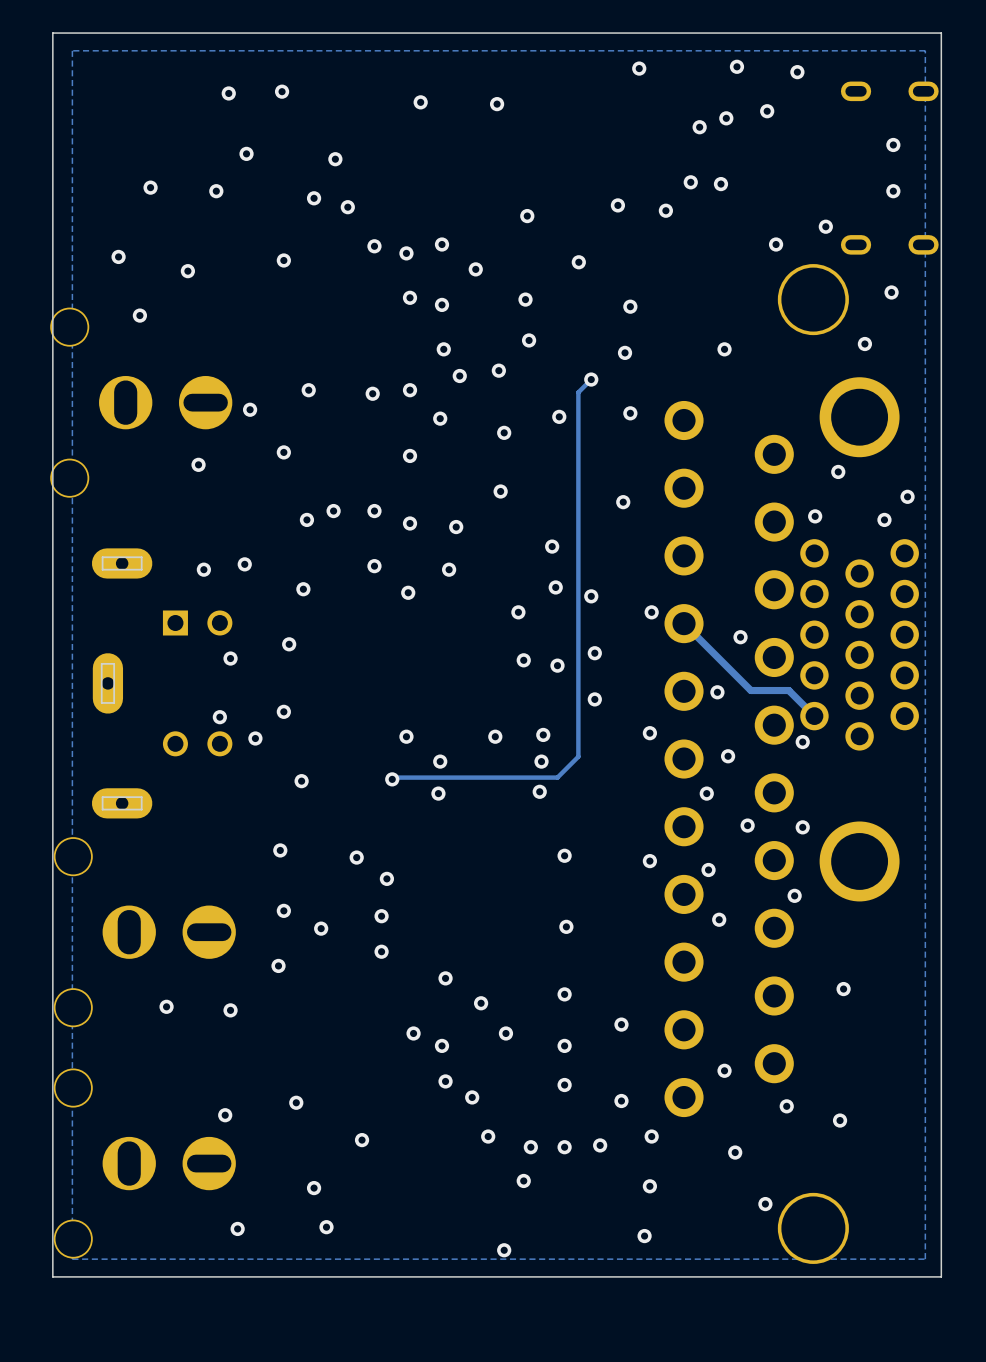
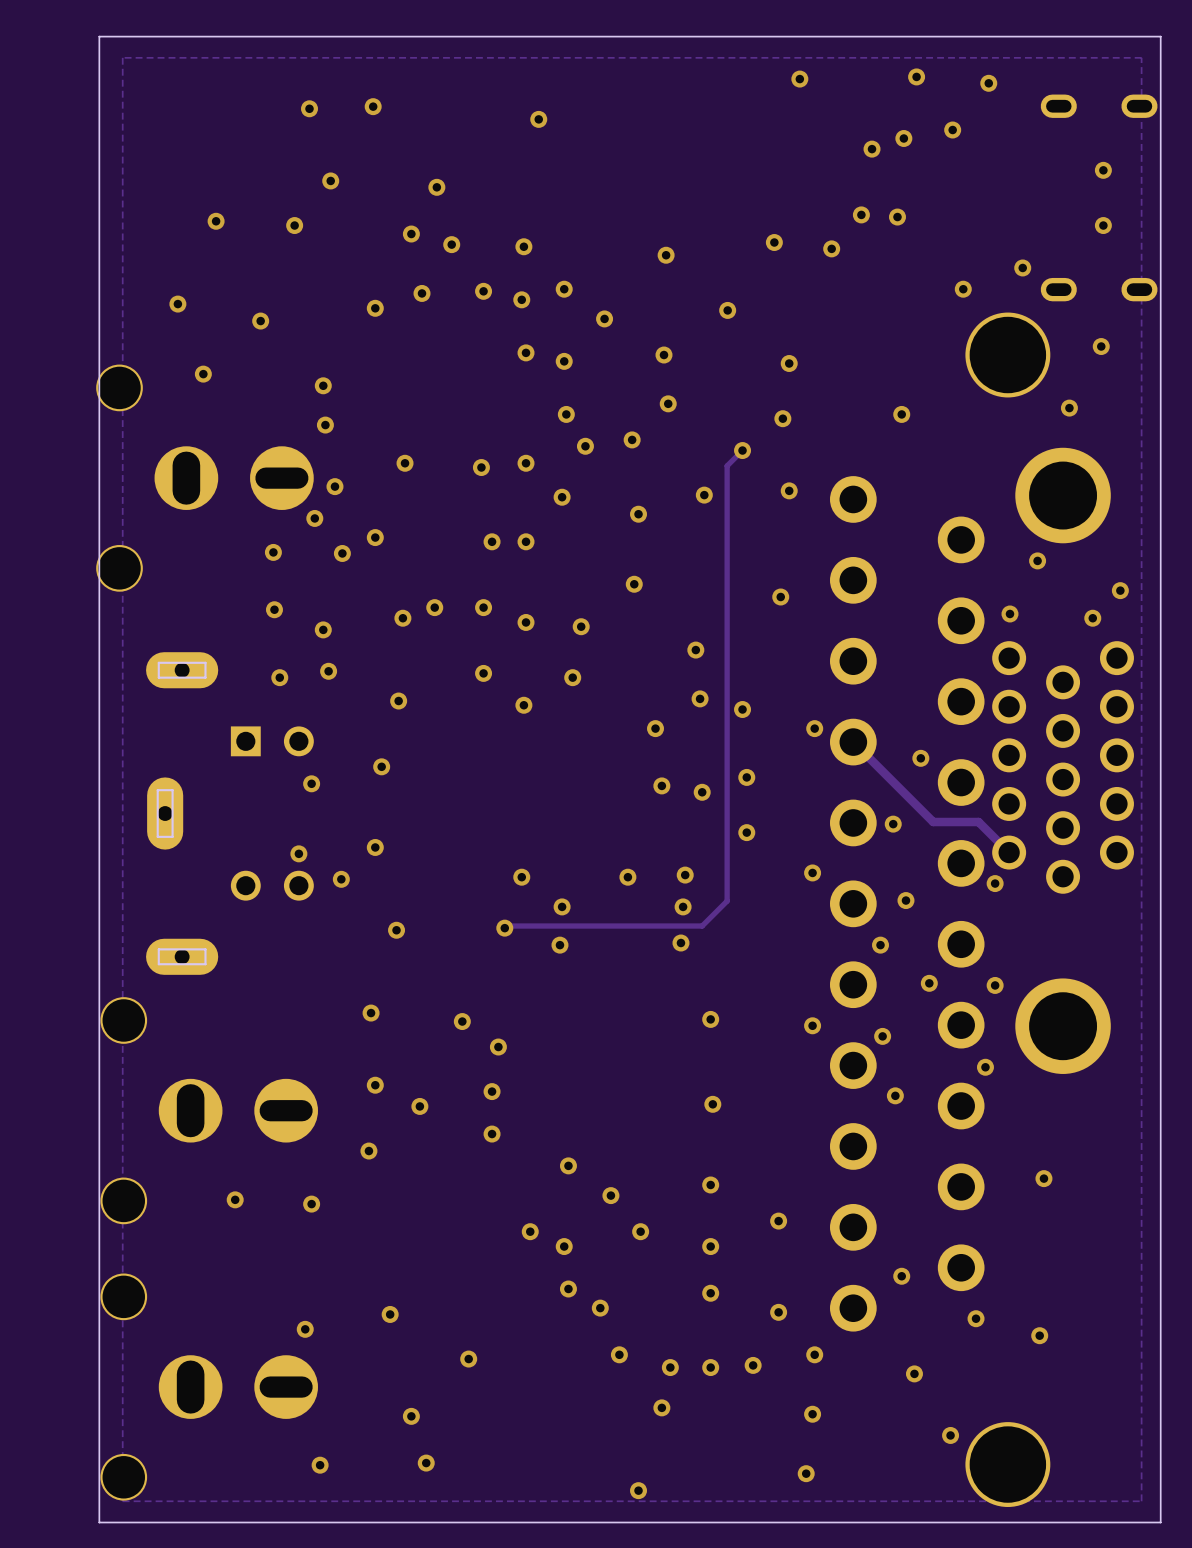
via: (497, 104) -> none
via: none -> (523, 246)
via: none -> (422, 293)
via: none -> (323, 385)
via: none -> (325, 425)
via: none -> (314, 518)
via: none -> (492, 541)
via: none -> (342, 553)
via: none -> (274, 609)
via: none -> (323, 629)

